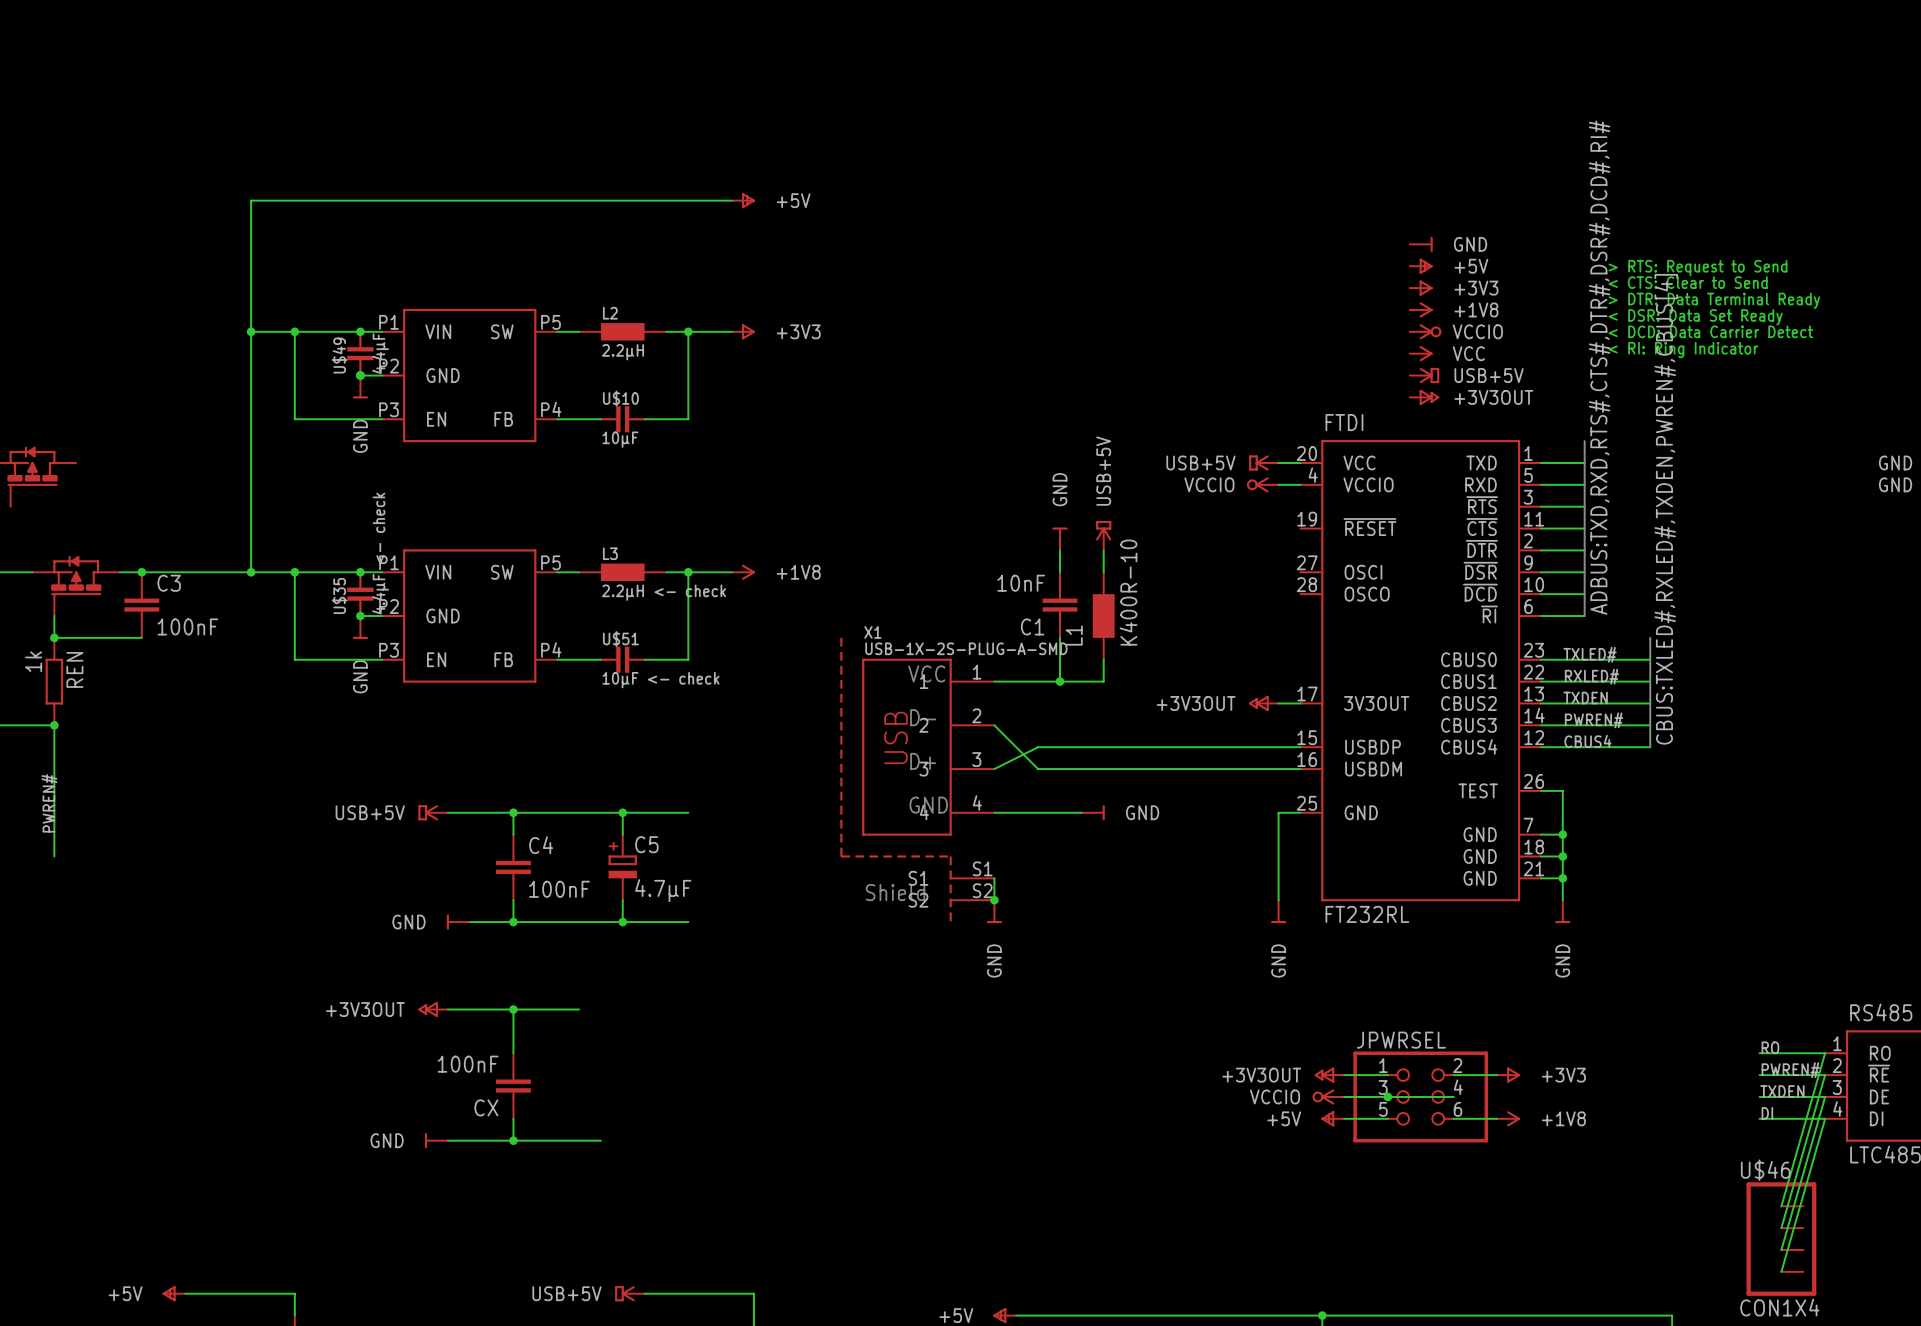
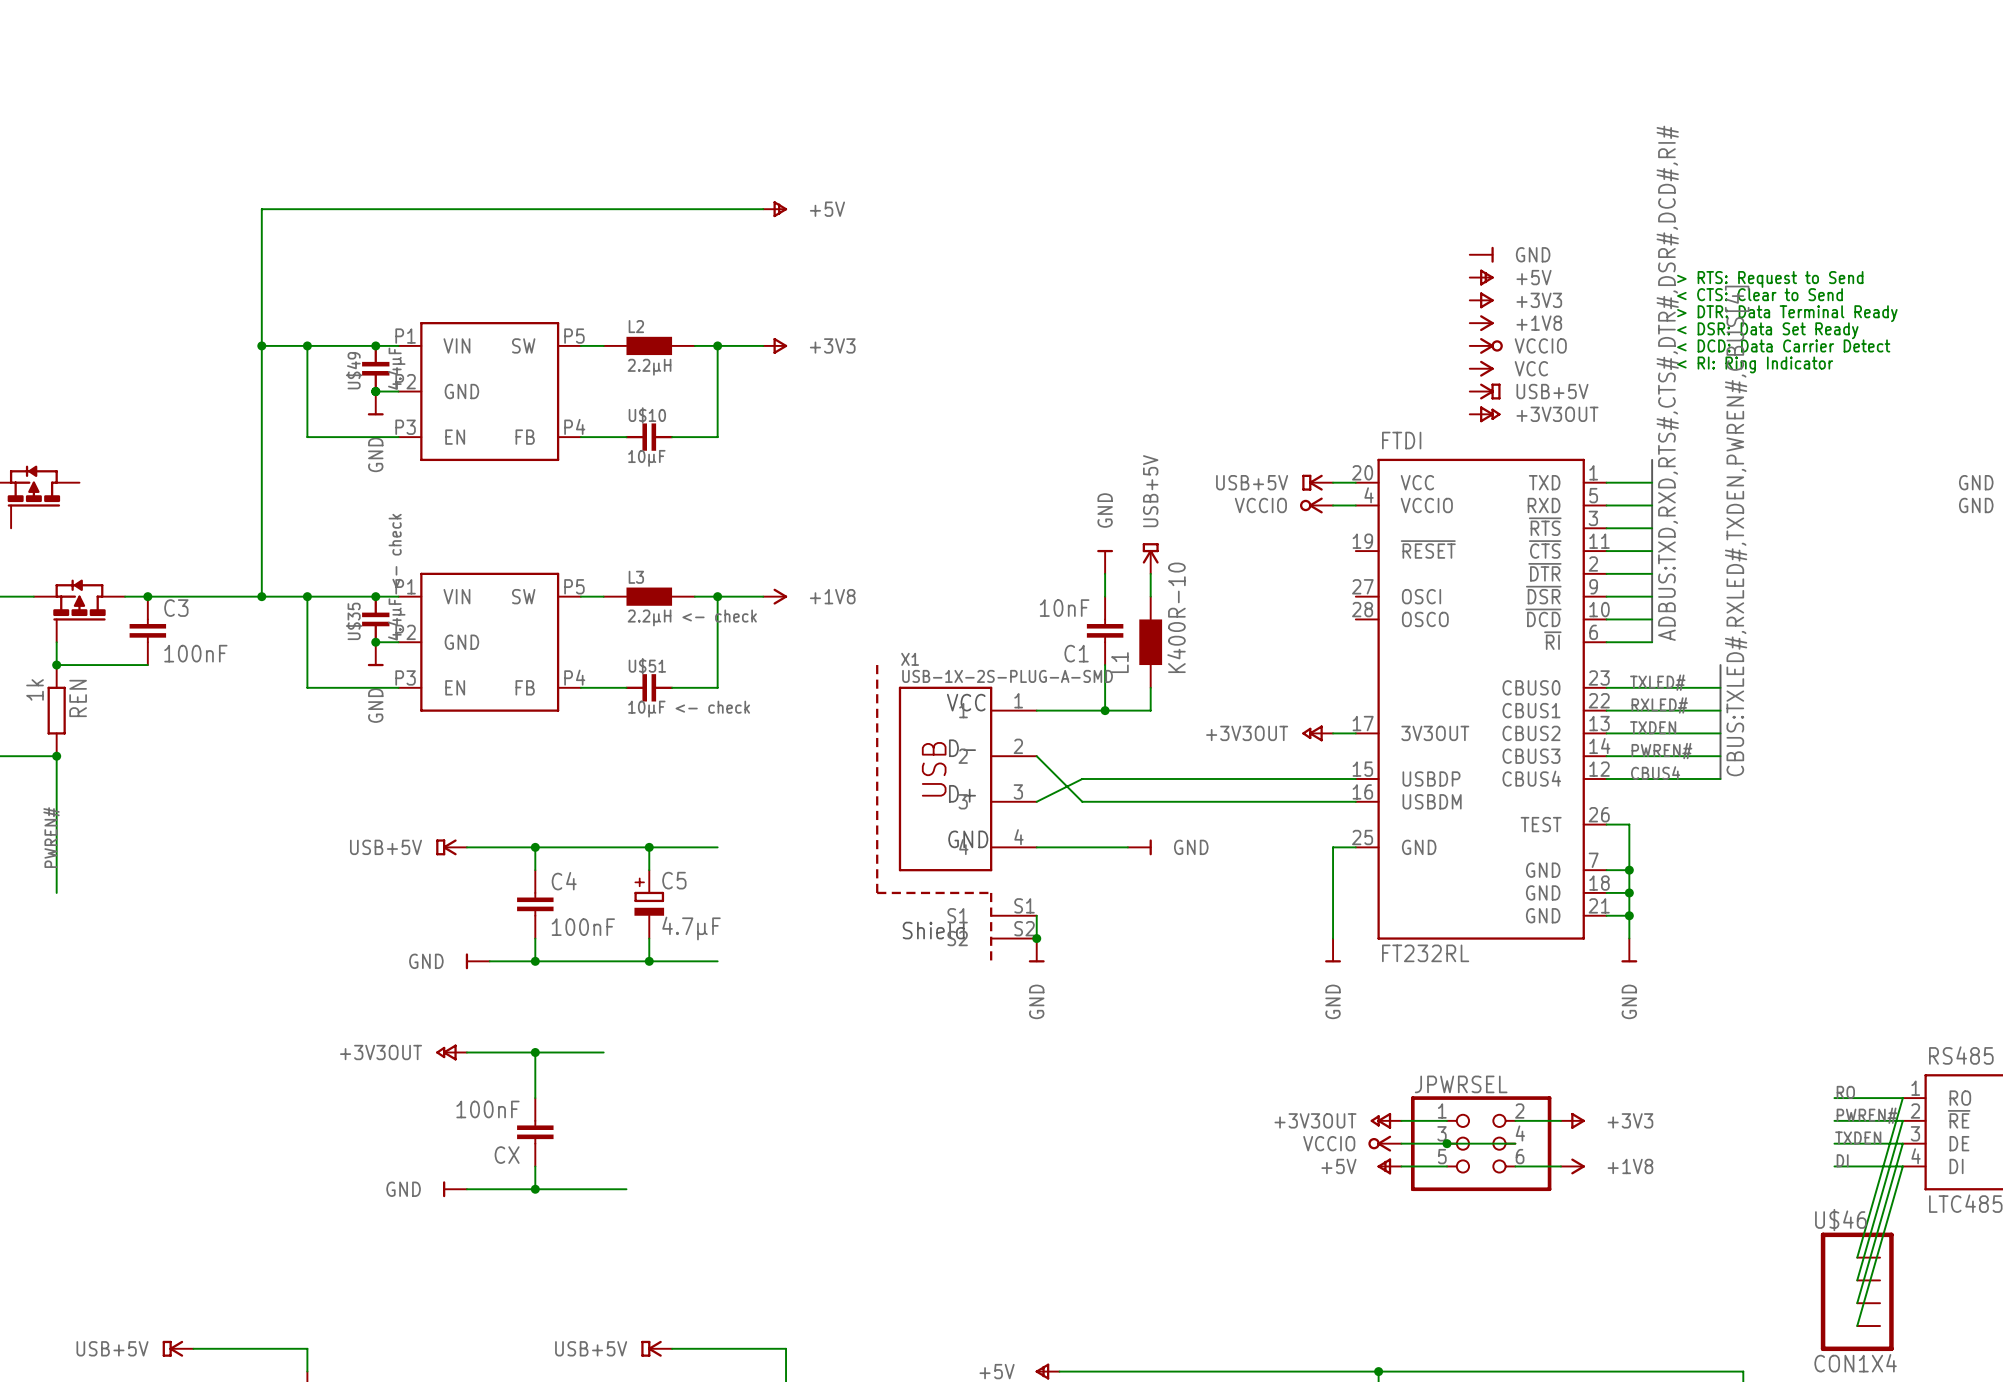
power symbol shape: [162, 1286, 186, 1302] -> [162, 1340, 194, 1357]

